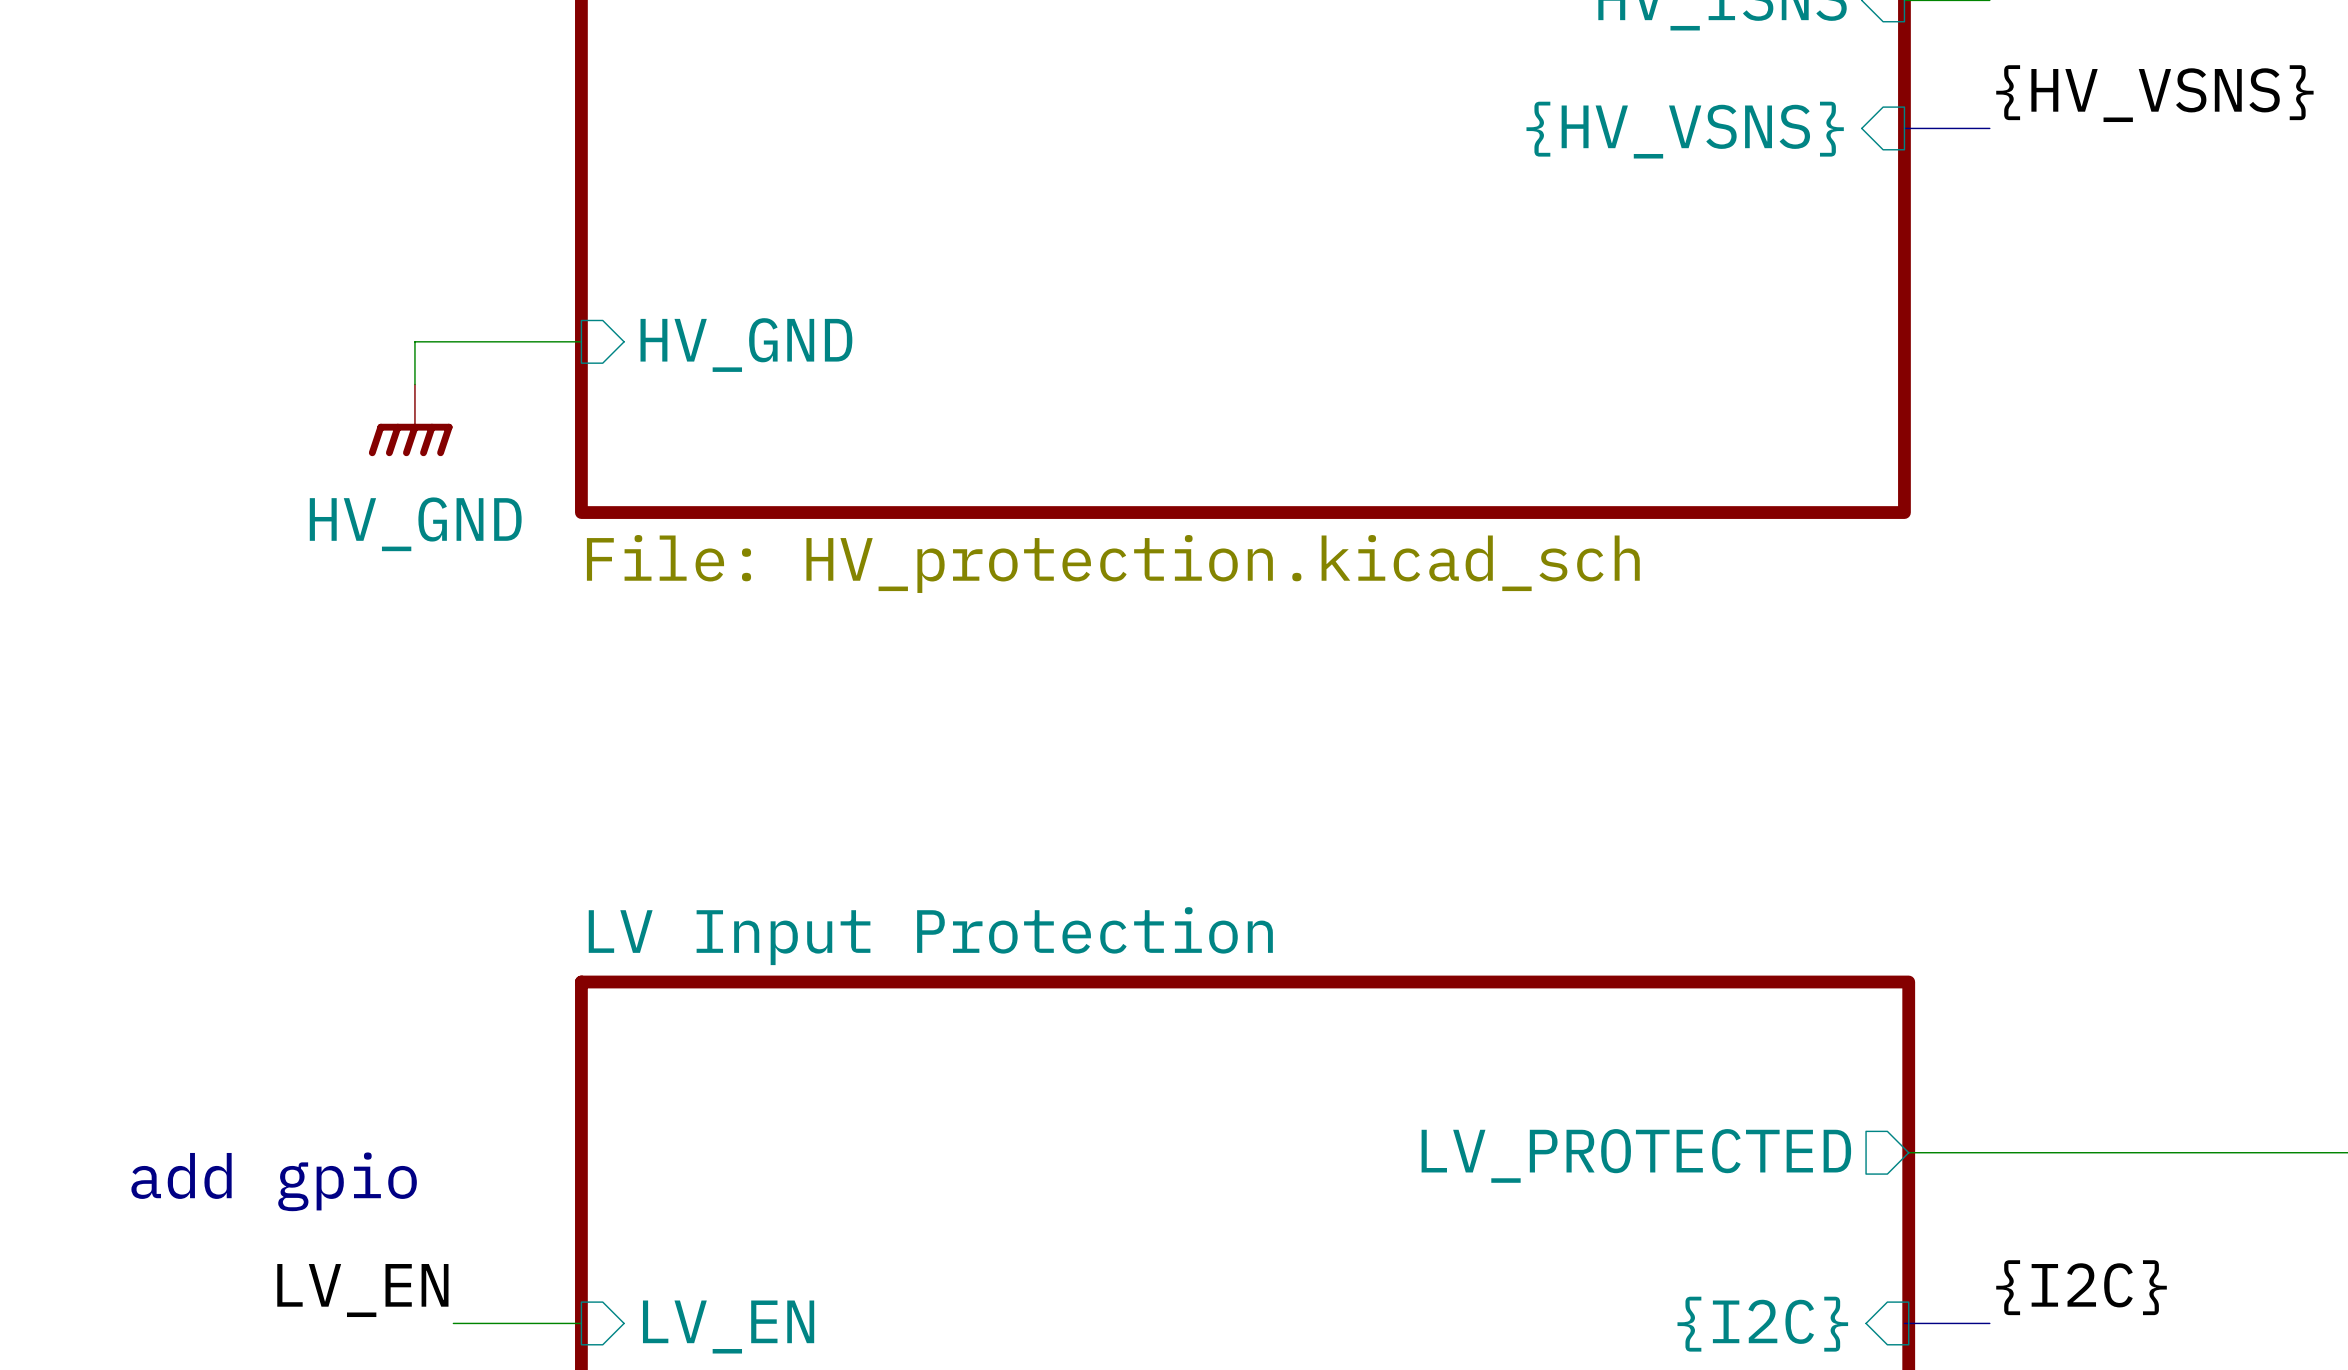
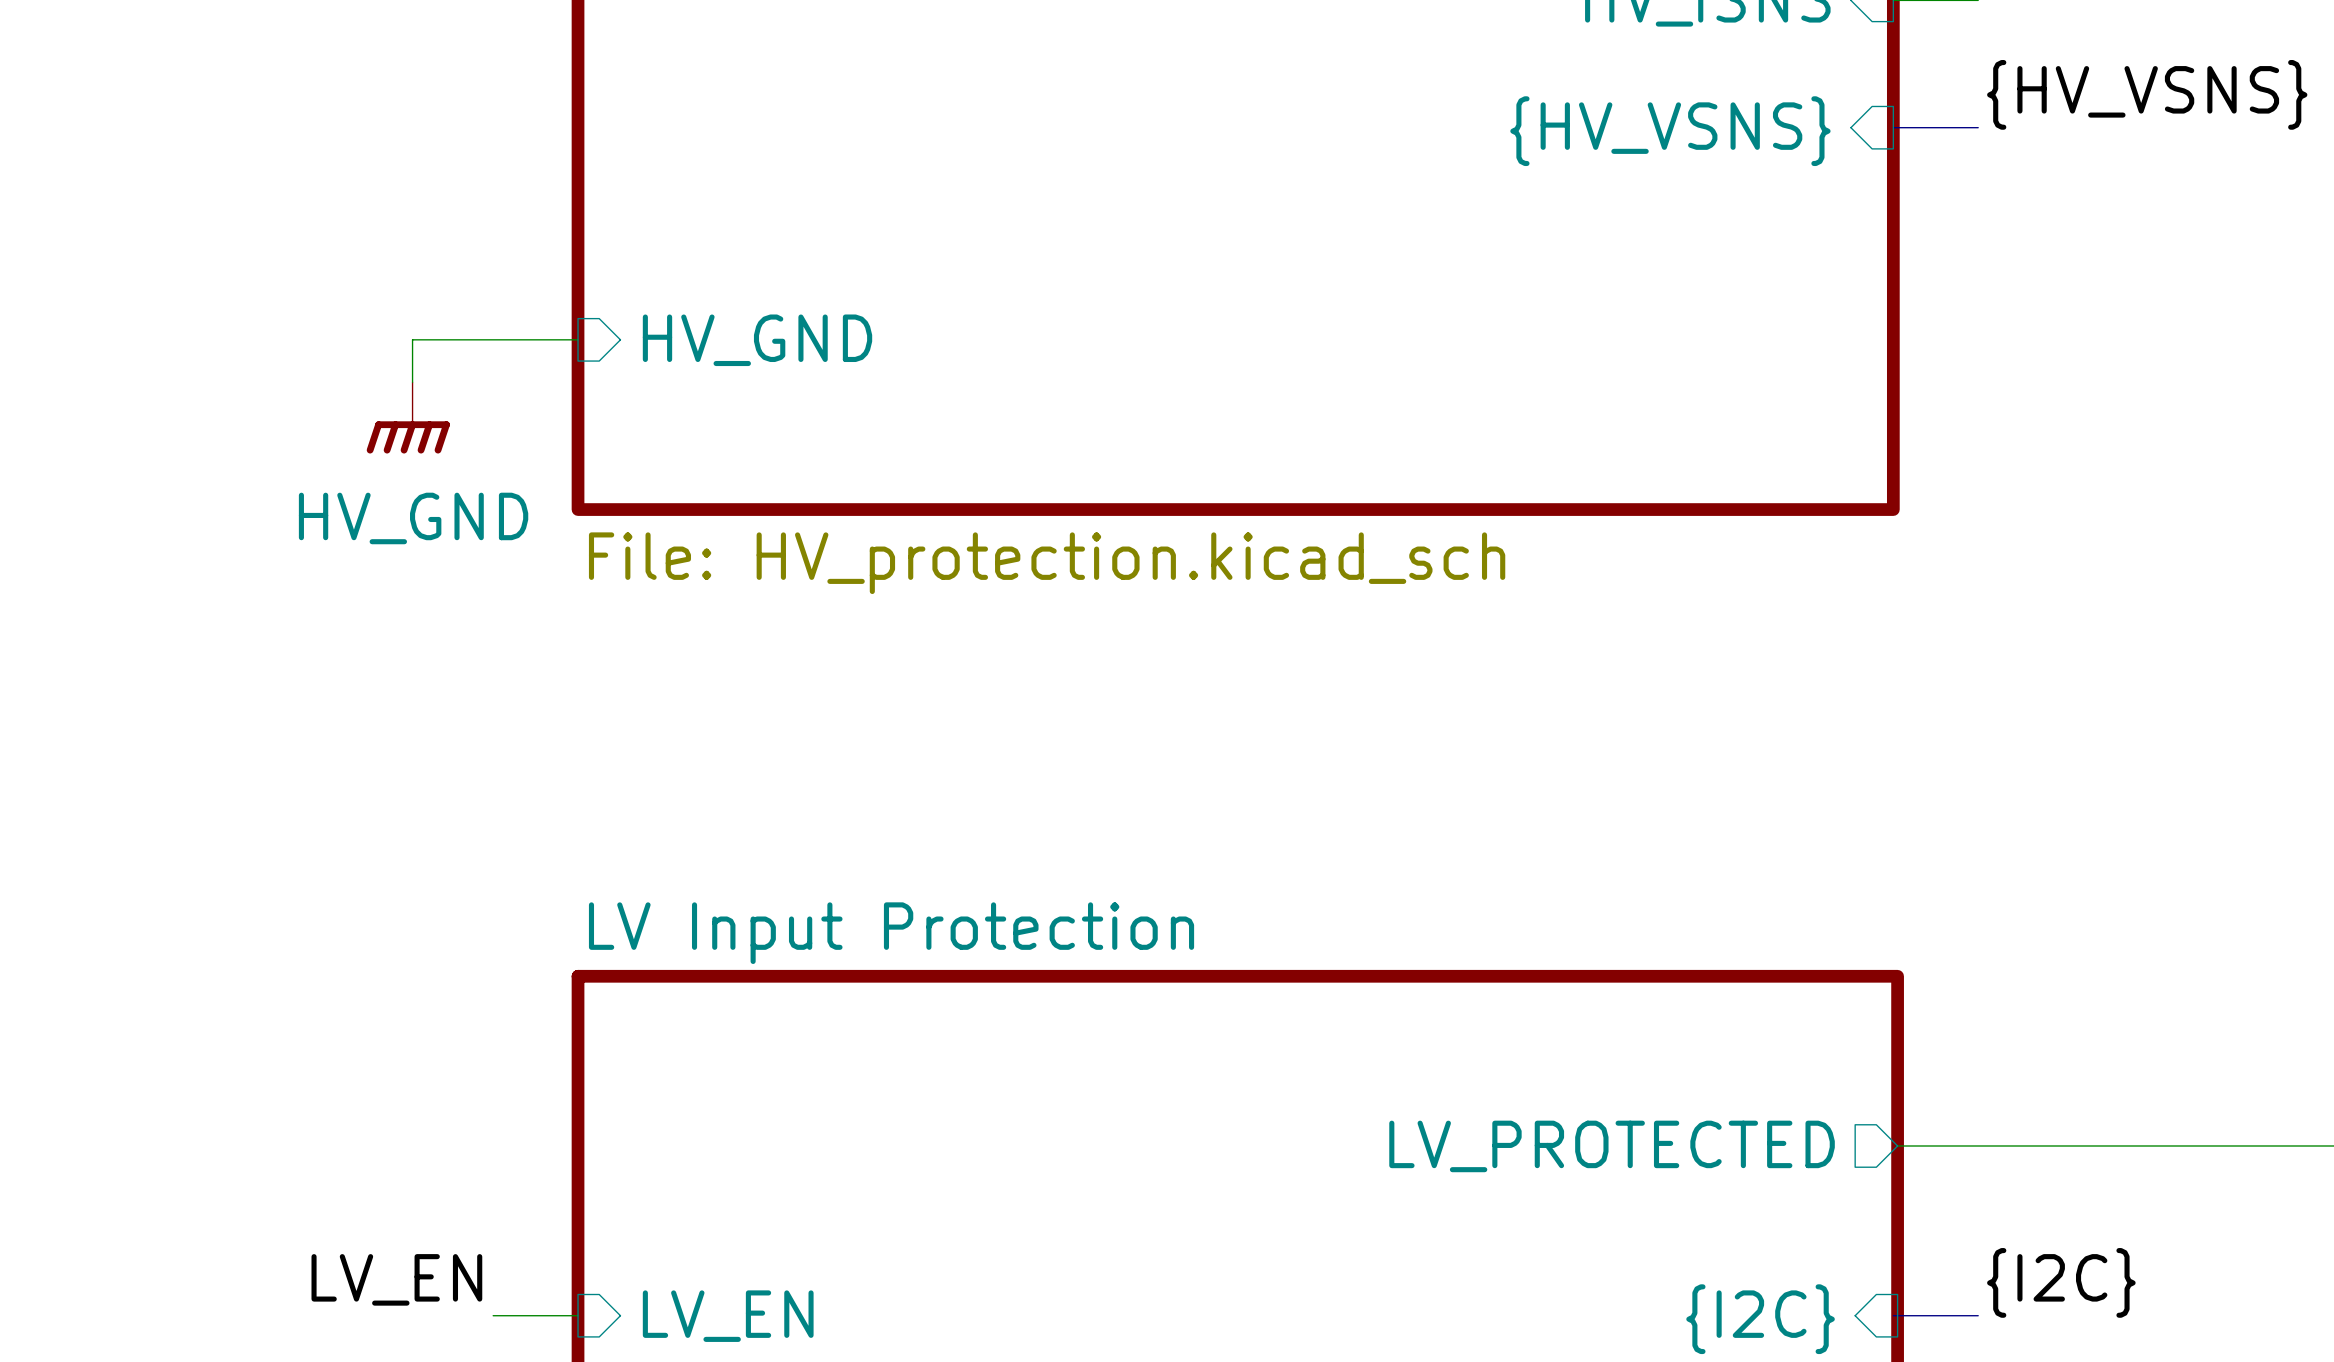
text: add gpio (274, 1181) -> none
label position: LV_EN (362, 1290) -> LV_EN (396, 1279)
wire: (453, 1323) (496, 1323) -> none

